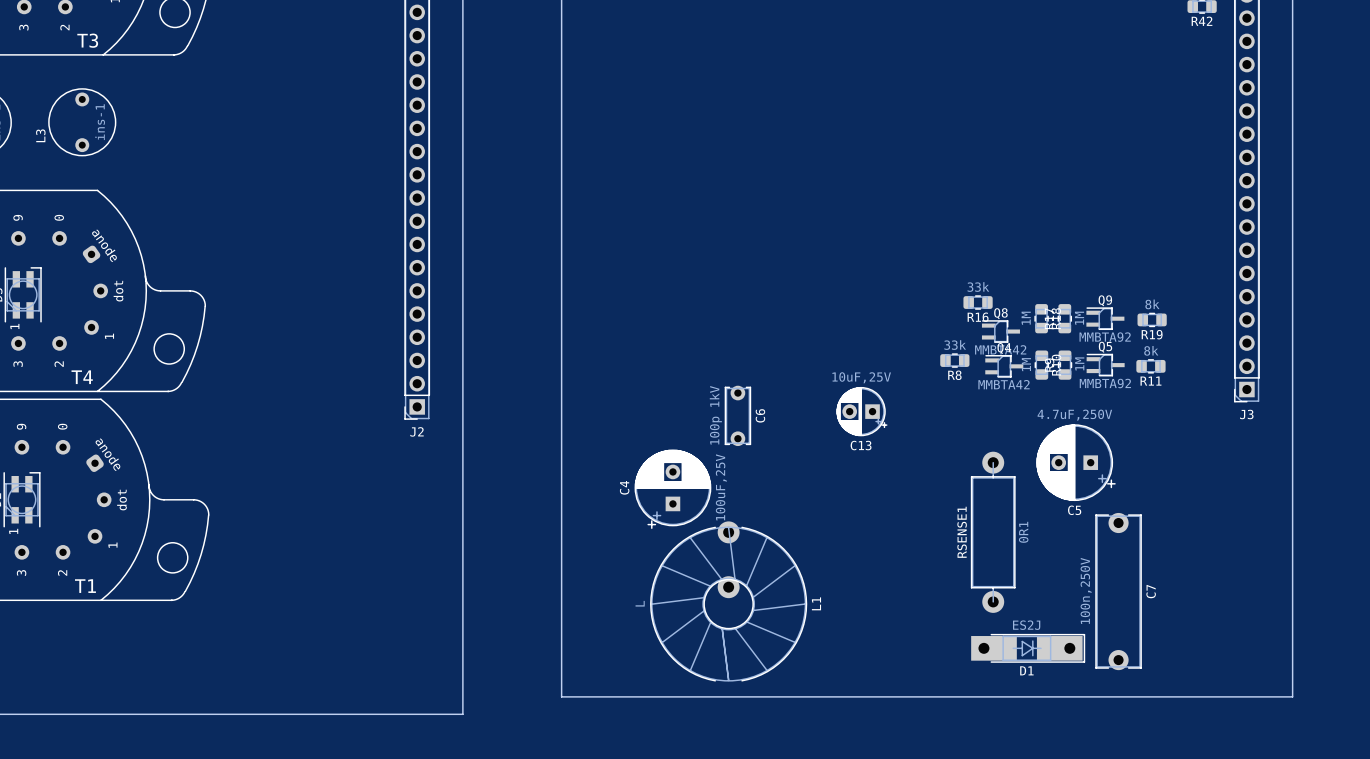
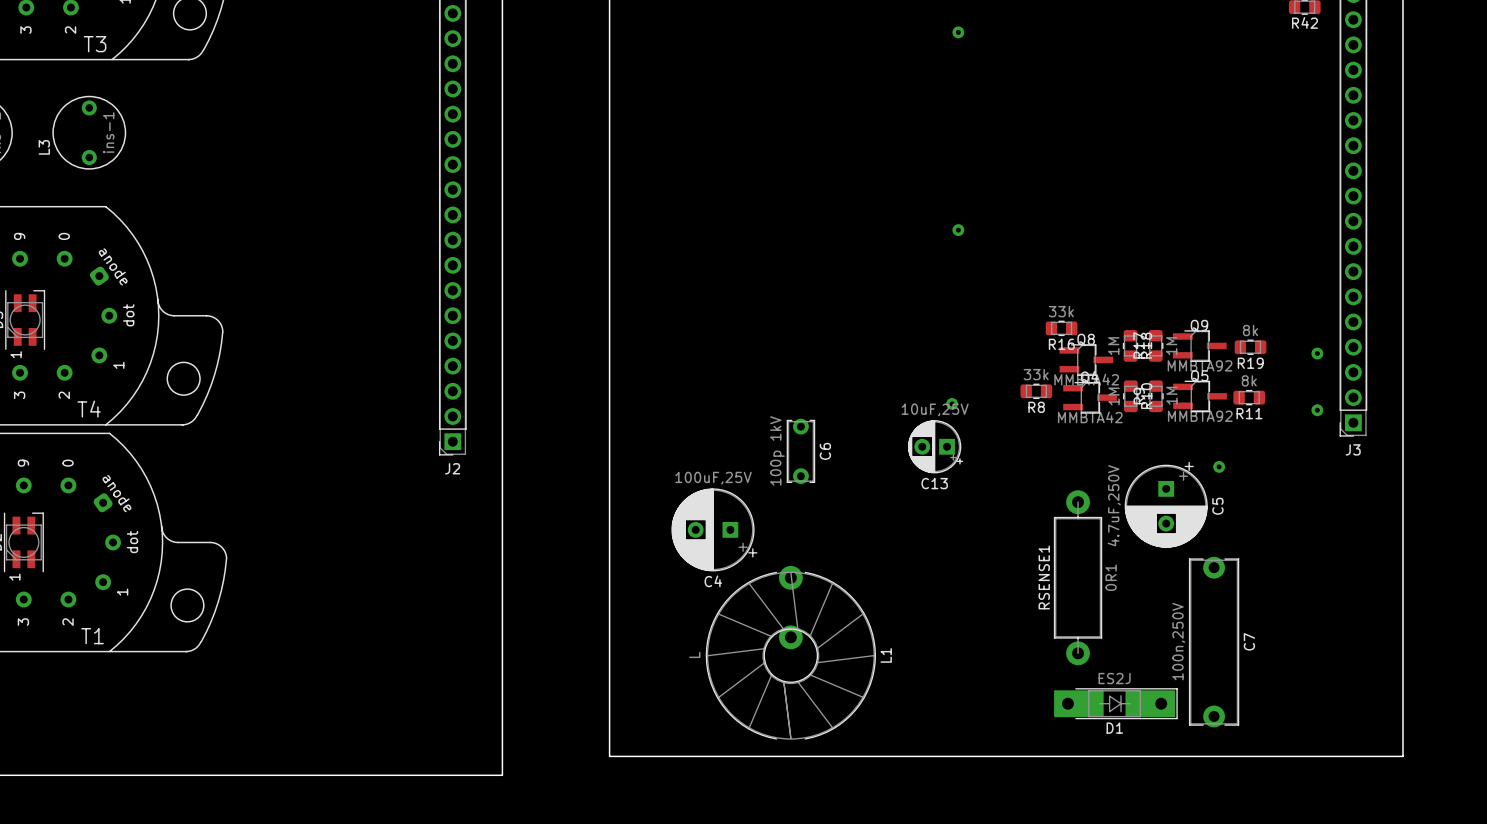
part: none -> (958, 32)
part: none -> (958, 230)
Q9 footprint: [1086, 307, 1125, 330] -> [1172, 330, 1227, 362]
Q8 footprint: [981, 320, 1020, 343] -> [1059, 344, 1114, 376]
part: none -> (1317, 353)
Q5 footprint: [1086, 353, 1125, 377] -> [1173, 380, 1227, 413]
Q4 footprint: [985, 355, 1024, 378] -> [1063, 382, 1117, 414]
part: none -> (952, 403)
part: none -> (1317, 410)
part: none -> (1219, 466)
C5 rotation: 0° (1076, 462) -> 90° counterclockwise (1166, 504)
C4 rotation: 0° (672, 489) -> 90° counterclockwise (714, 529)

